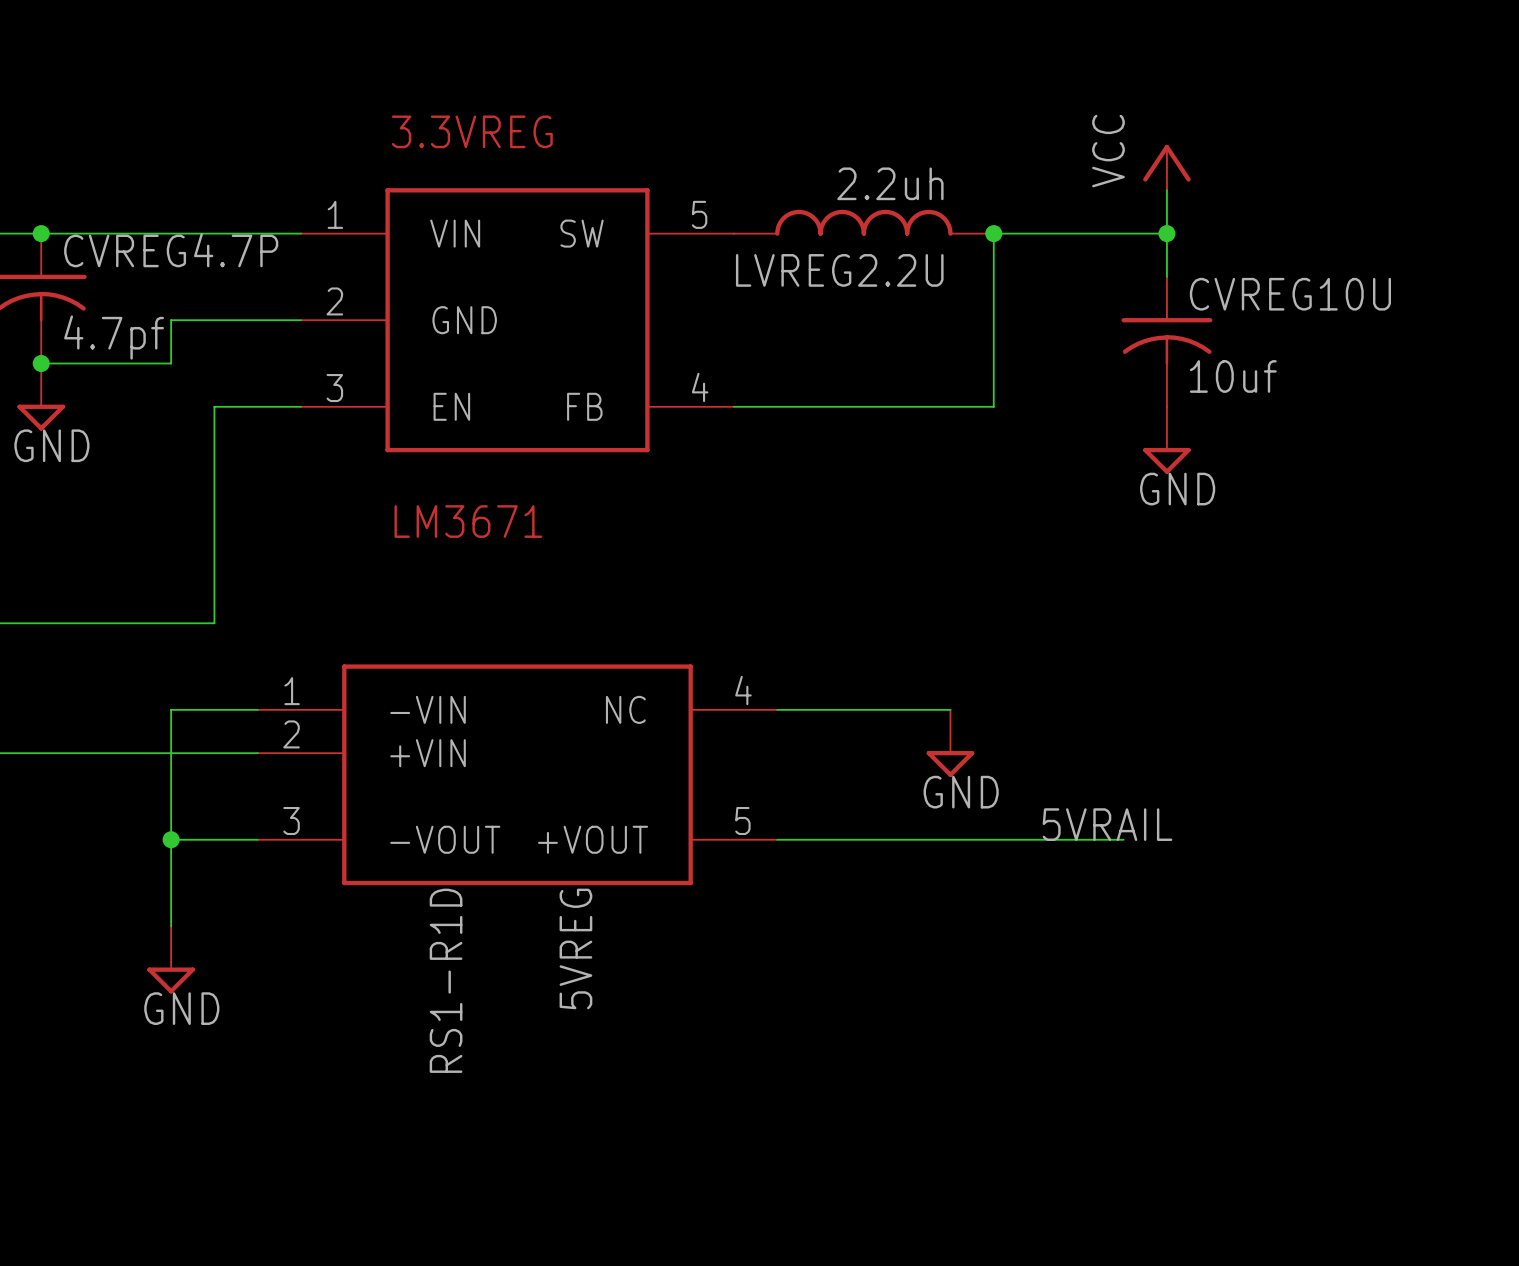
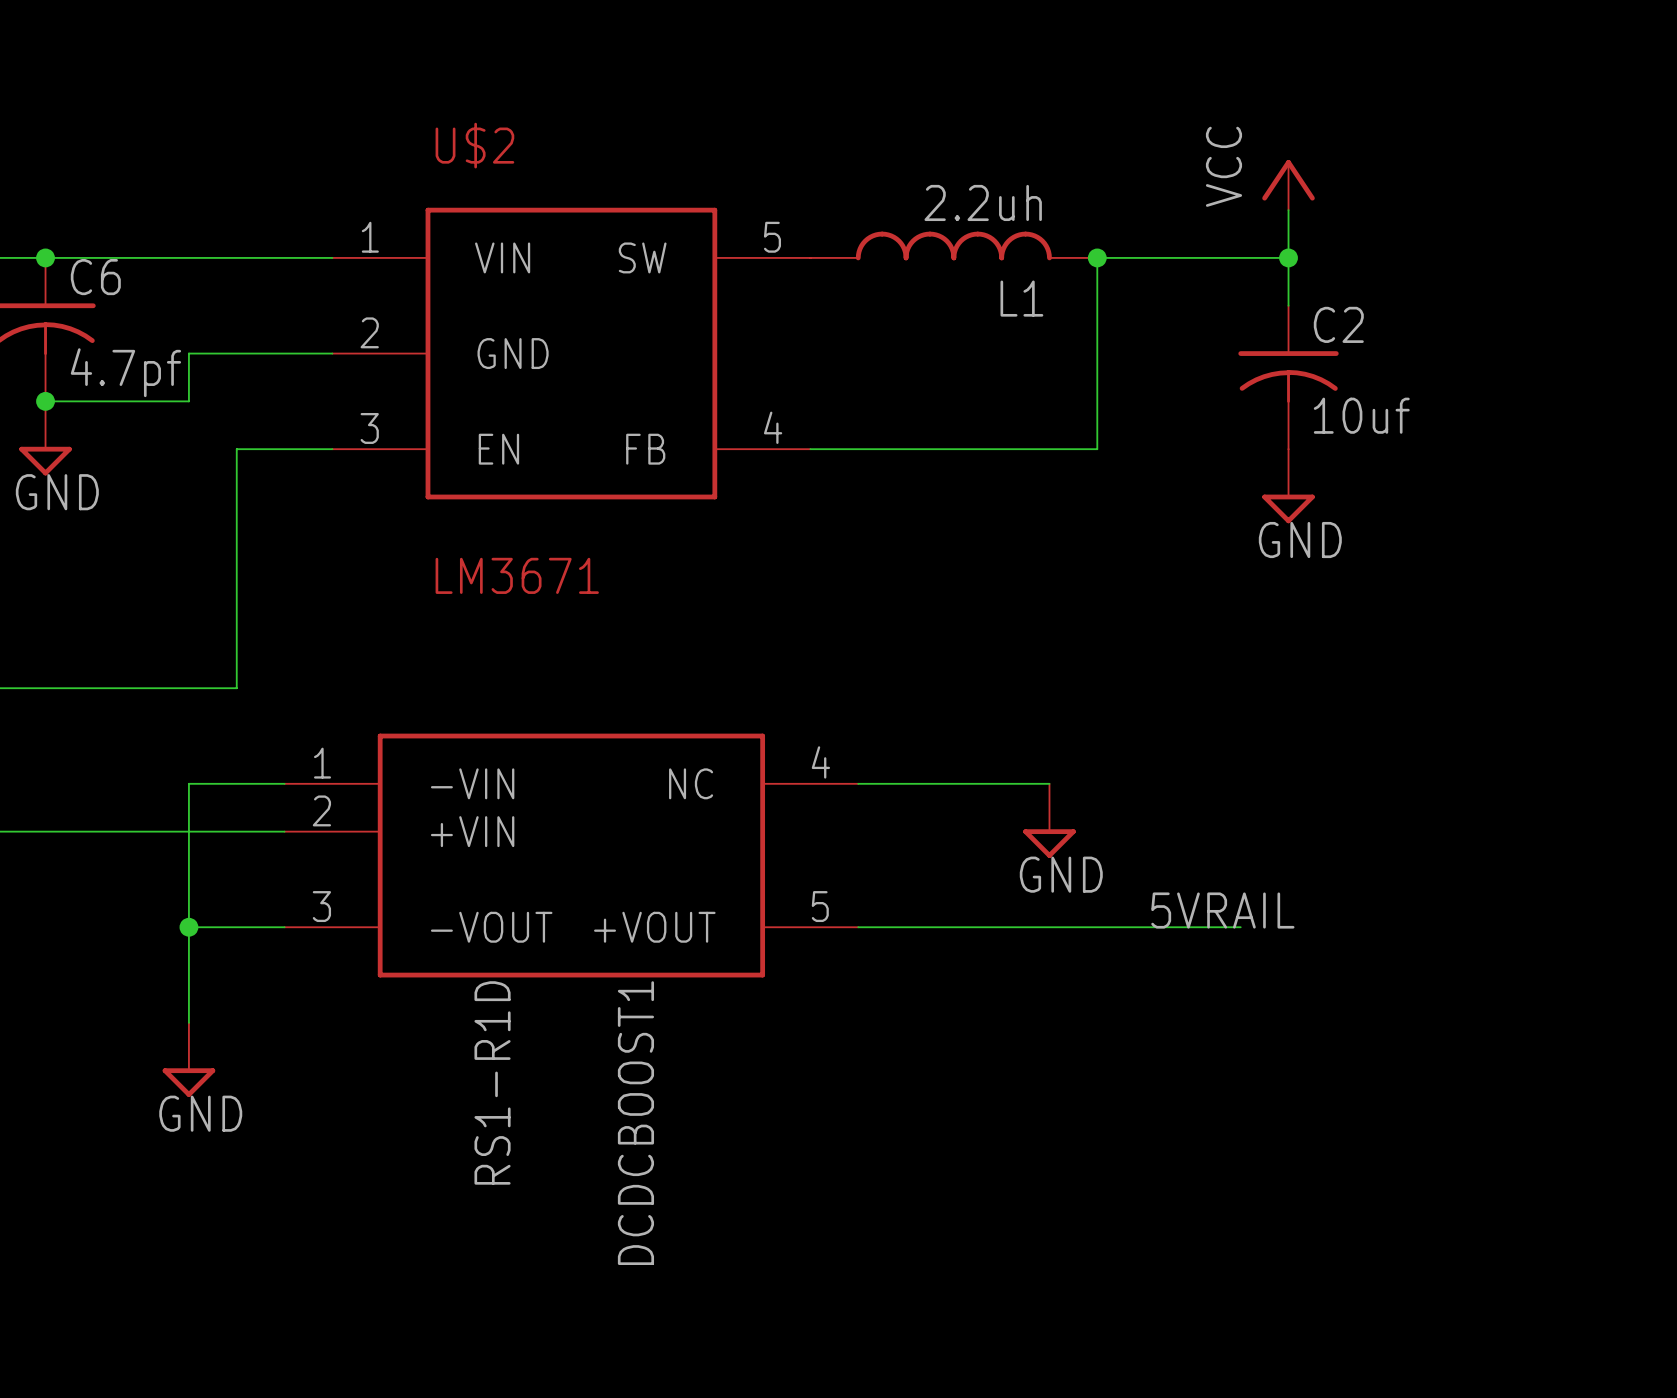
3.3VREG name: 3.3VREG (472, 131) -> U$2 (474, 145)
CVREG4.7P name: CVREG4.7P (171, 250) -> C6 (95, 277)
LVREG2.2U name: LVREG2.2U (839, 270) -> L1 (1021, 298)
CVREG10U name: CVREG10U (1290, 294) -> C2 (1338, 324)
5VREG name: 5VREG (575, 948) -> DCDCBOOST1 (635, 1123)

